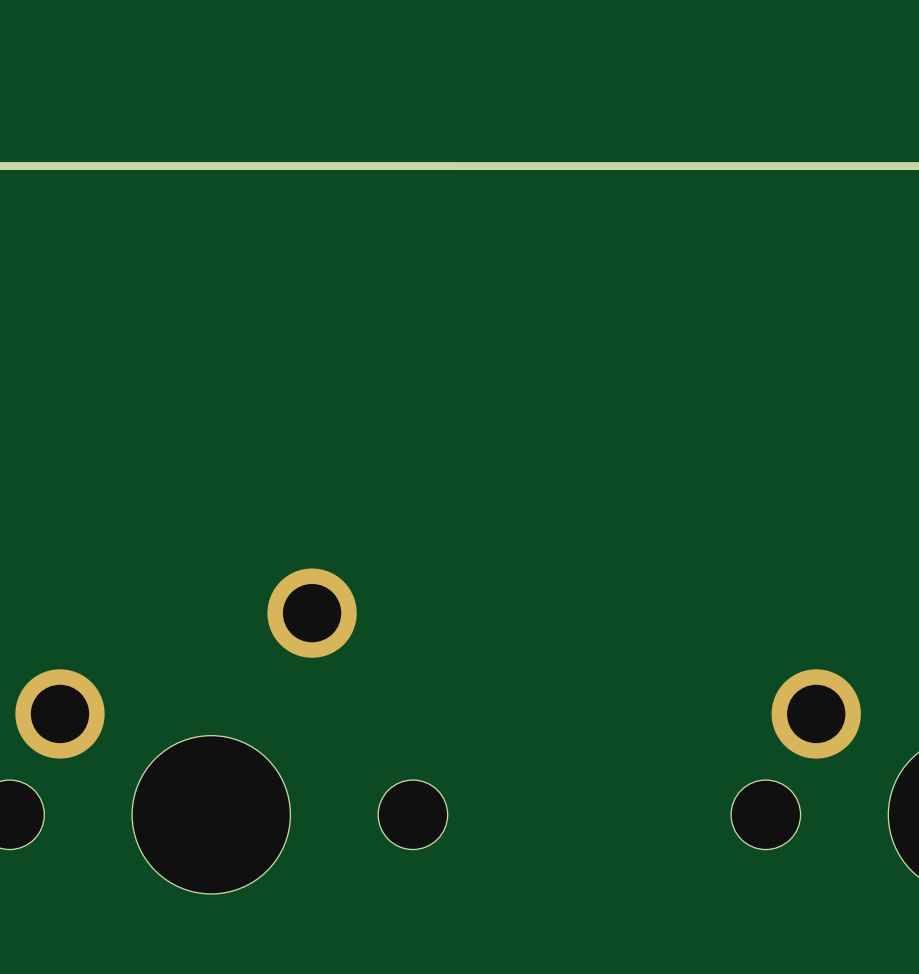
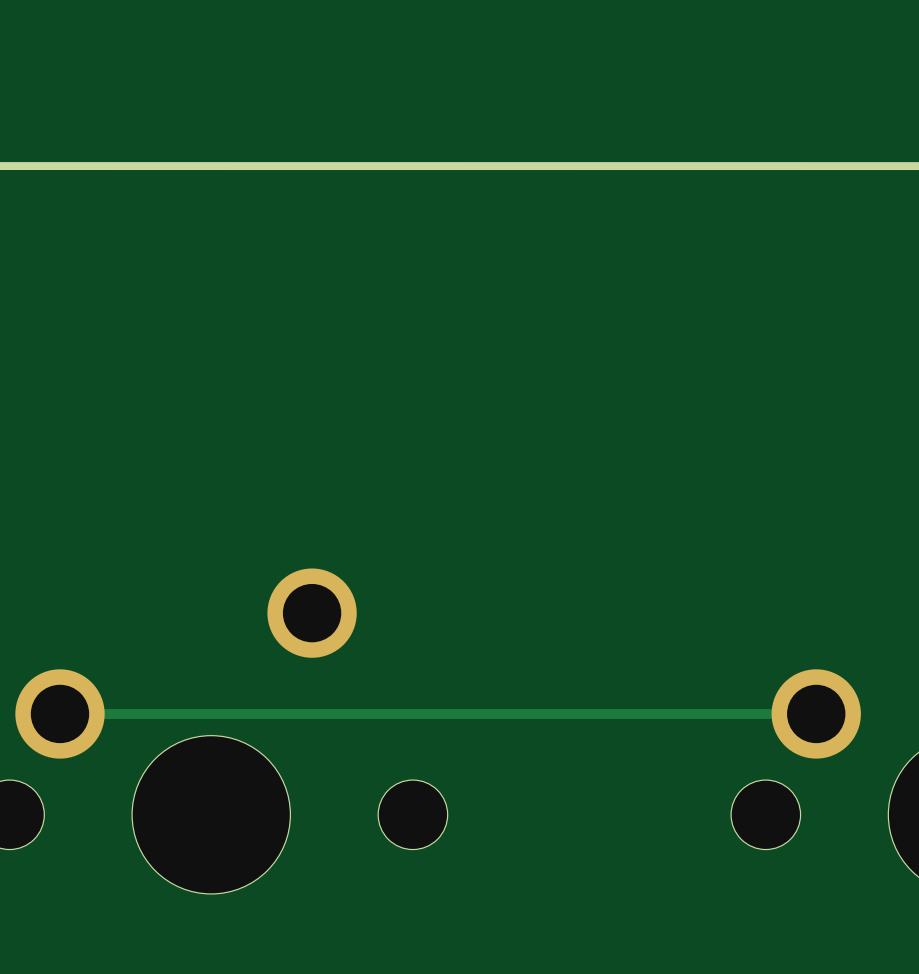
track: none -> (60, 713) (816, 713)

